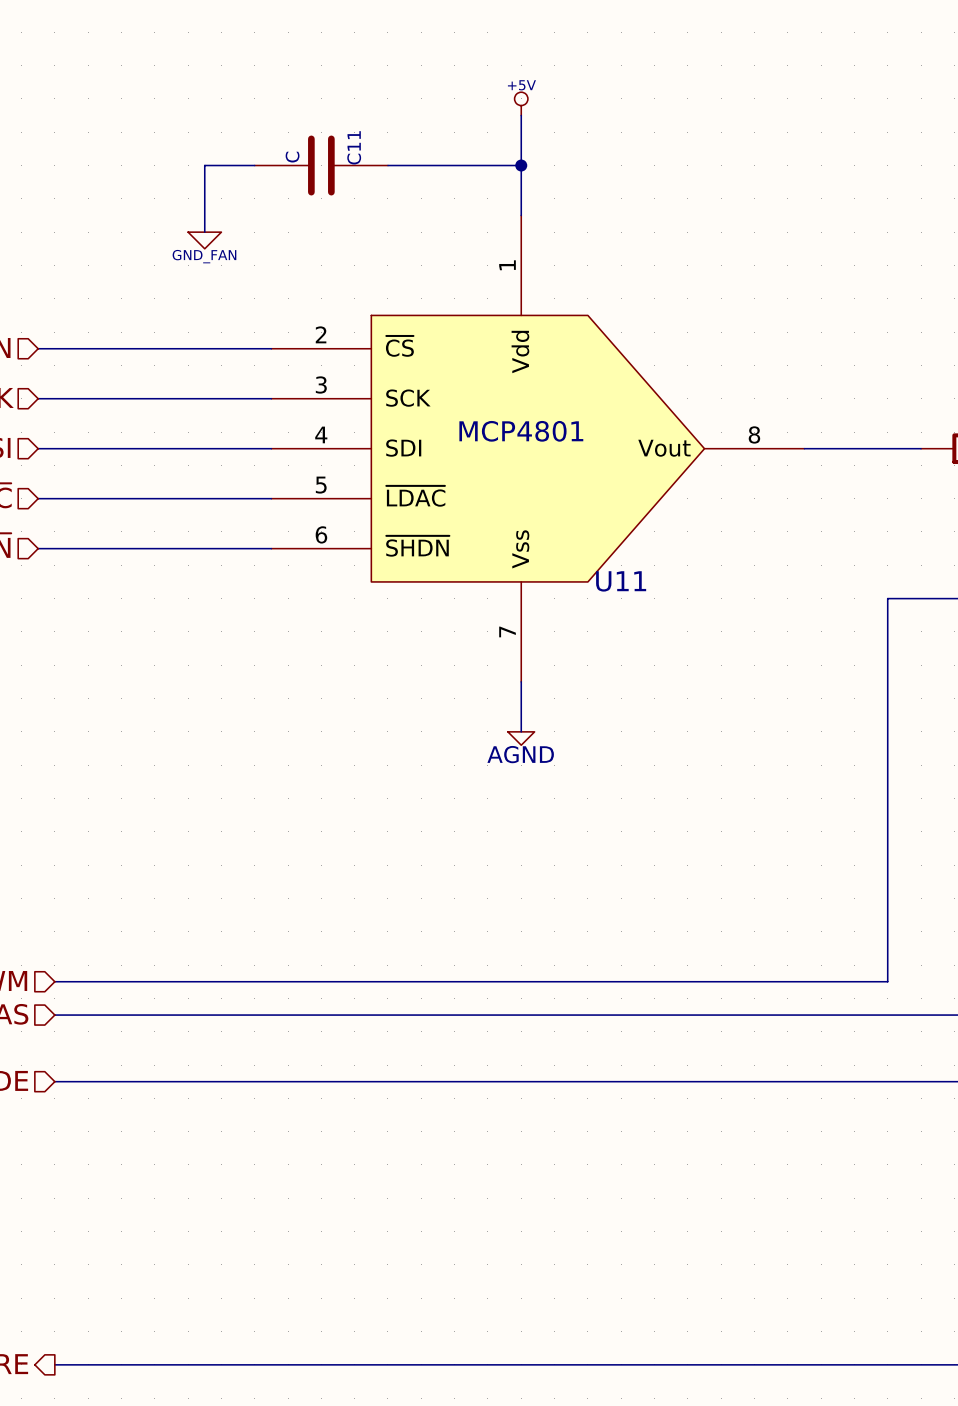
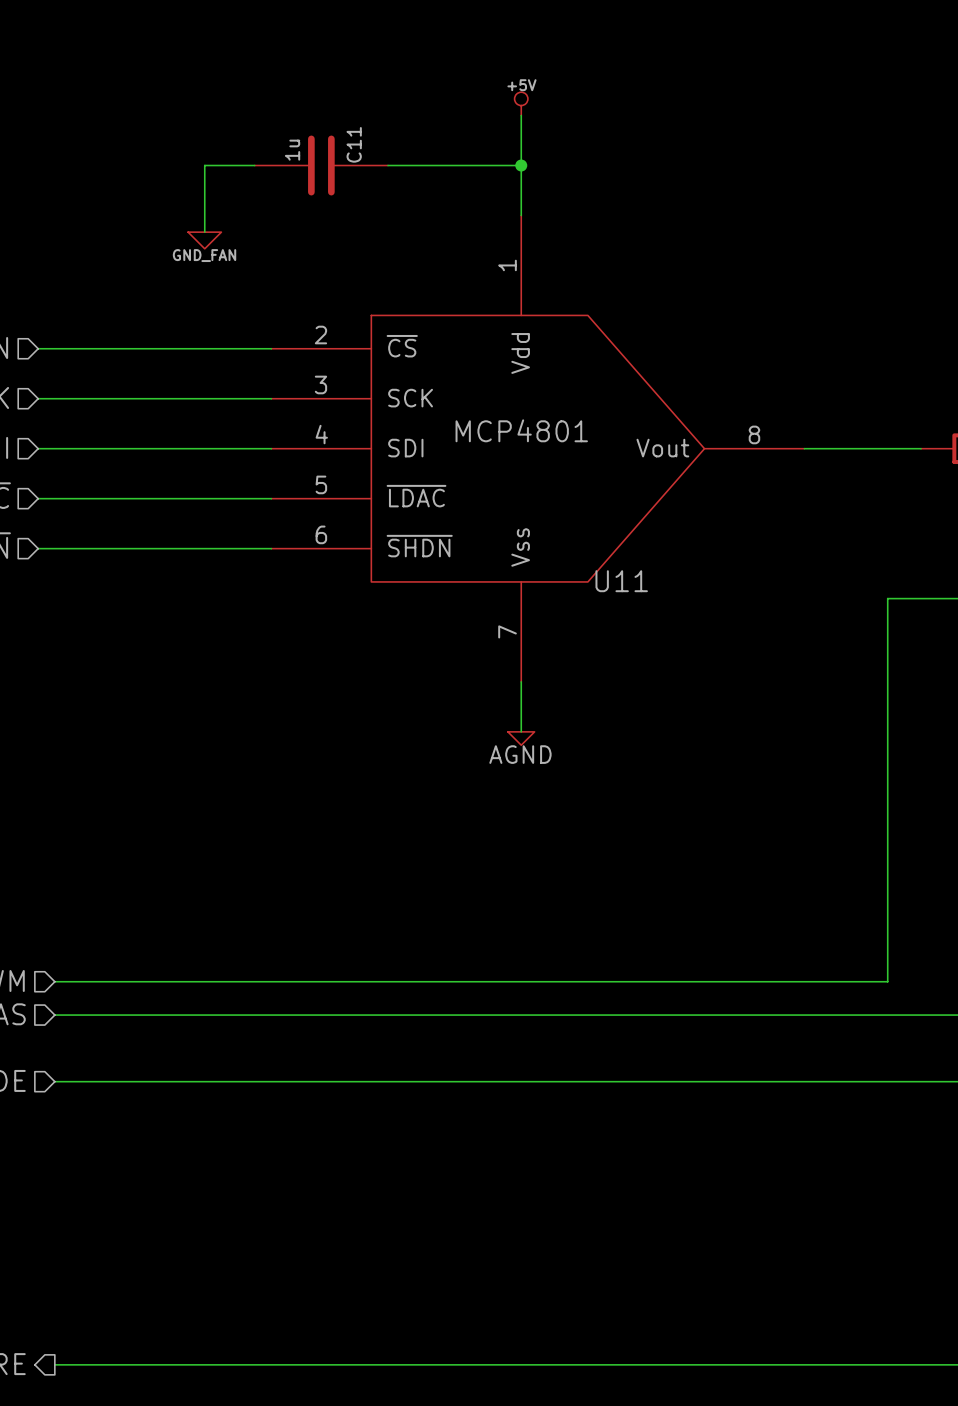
C11 value: C (292, 157) -> 1u (292, 150)

